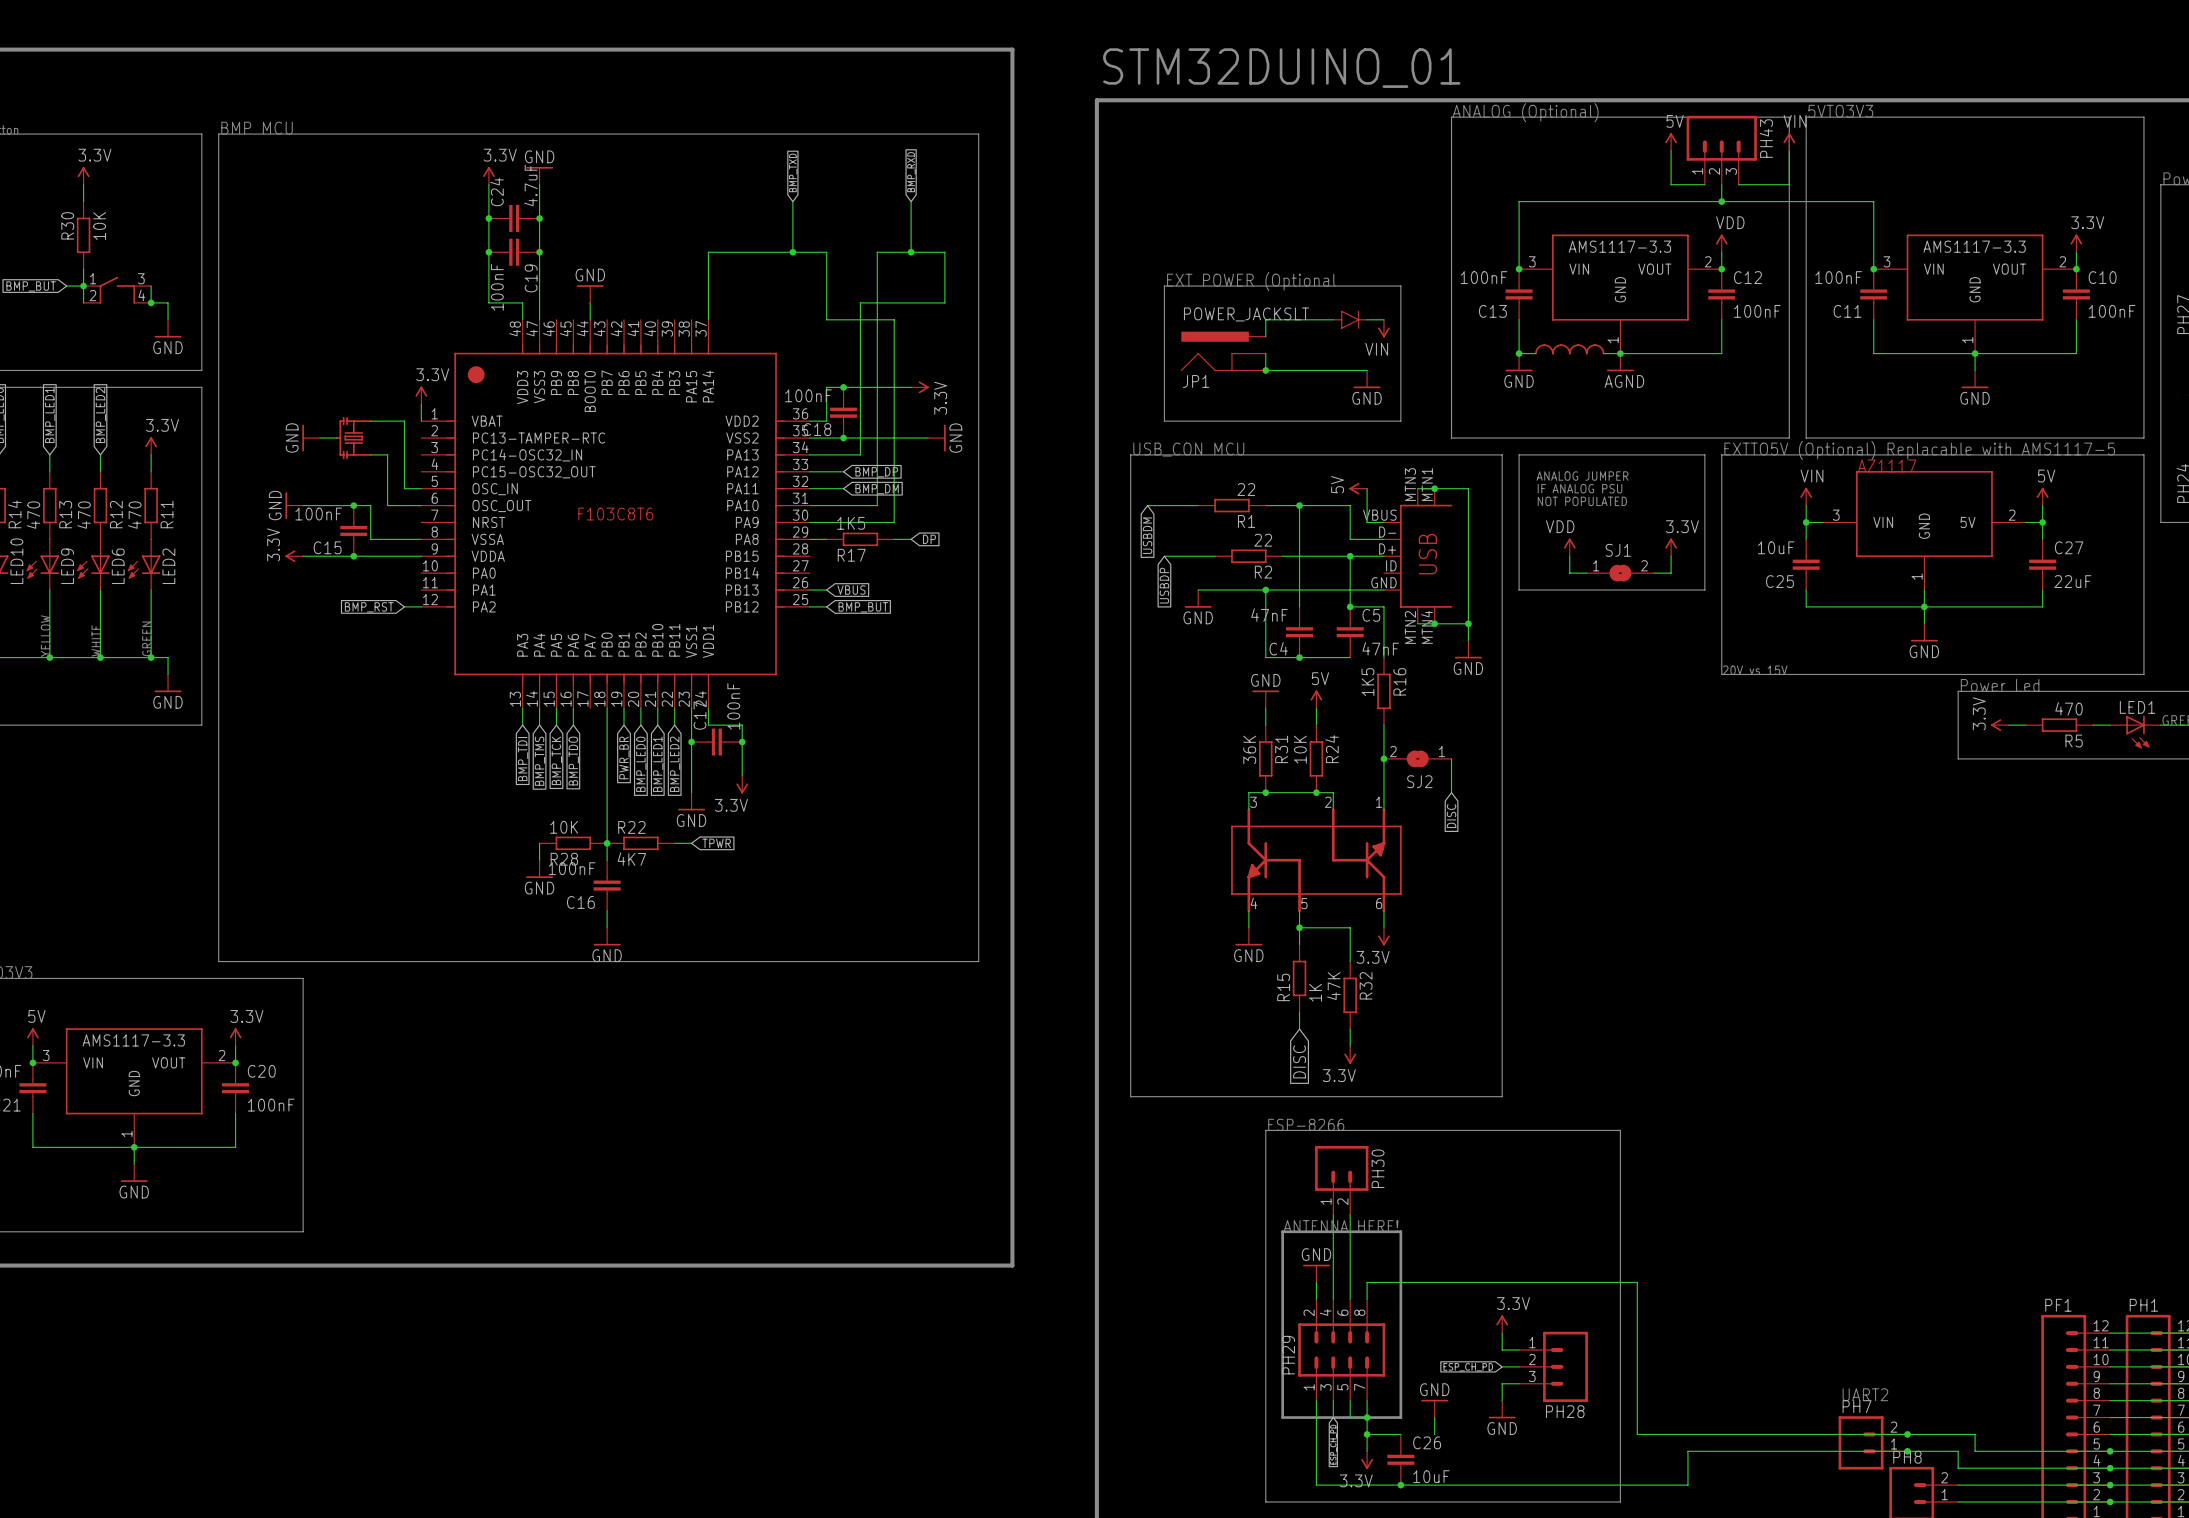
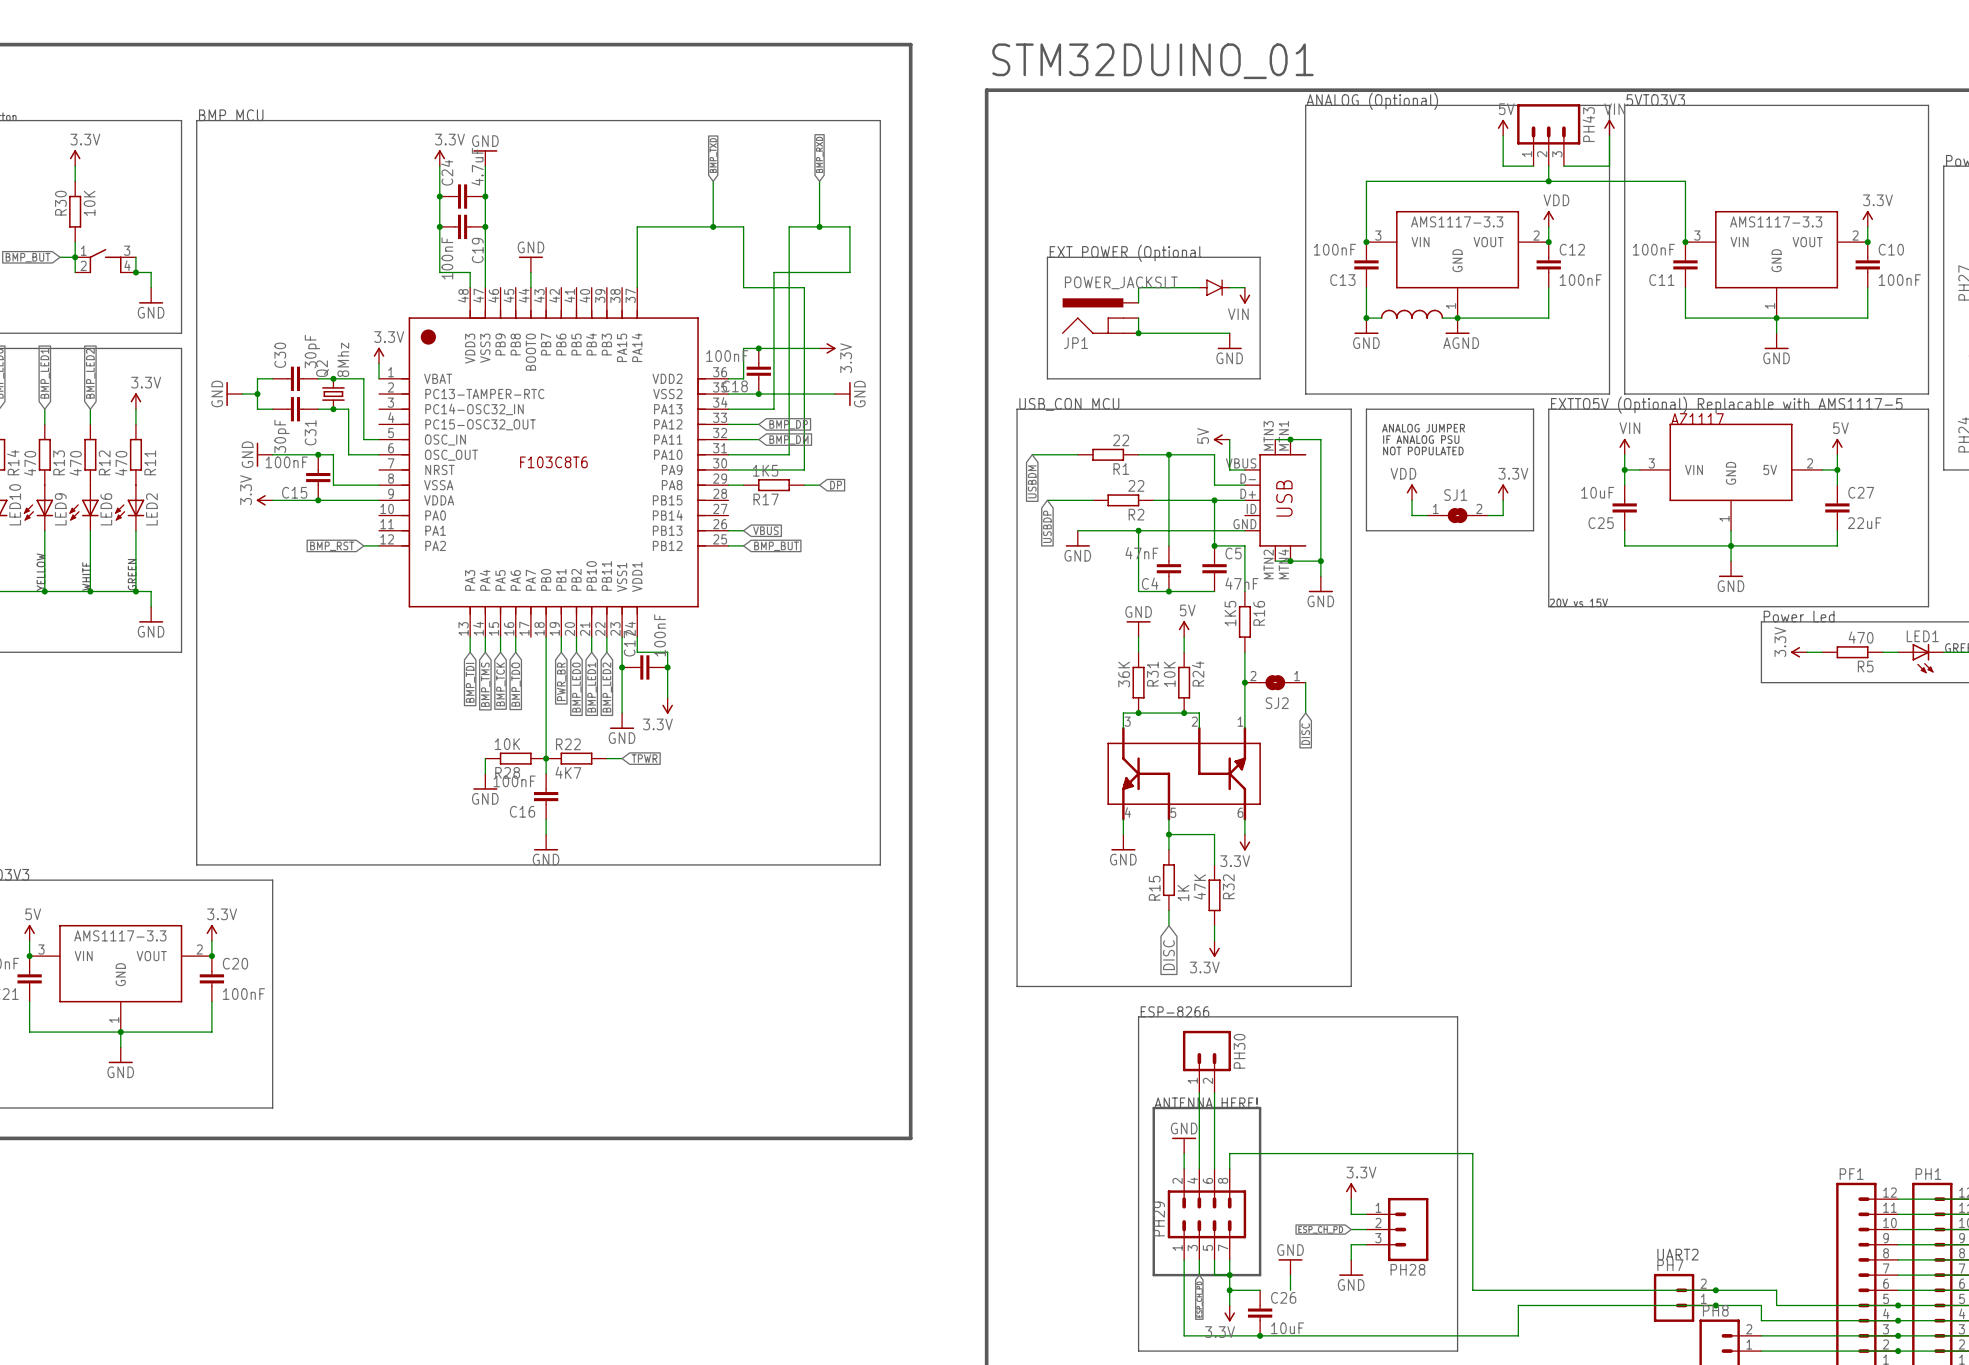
wire: none -> (272, 378) (257, 378) (257, 409) (272, 409)
C30: none -> 30pF (295, 378)
junction: none -> (333, 378)
wire: none -> (242, 394) (257, 394)
junction: none -> (257, 394)
power symbol position: GND (311, 438) -> GND (234, 394)
part: (353, 438) -> none
Q2: none -> 8Mhz (333, 394)
C31: none -> 30pF (295, 409)
junction: none -> (333, 409)

